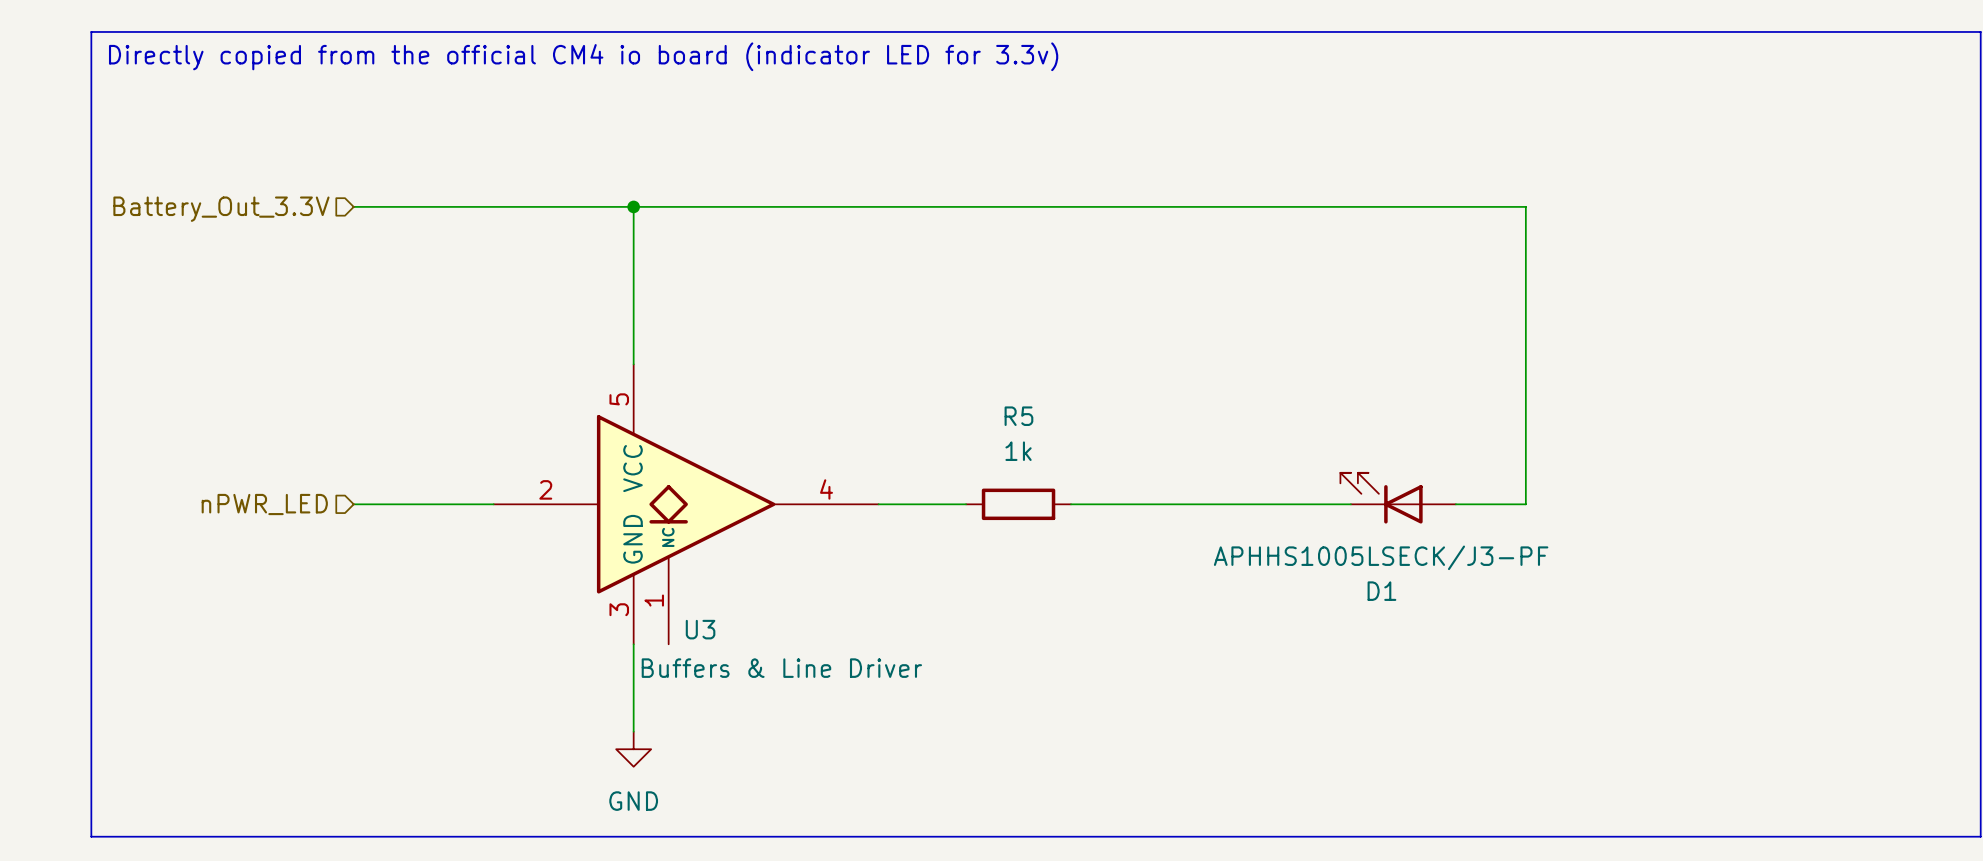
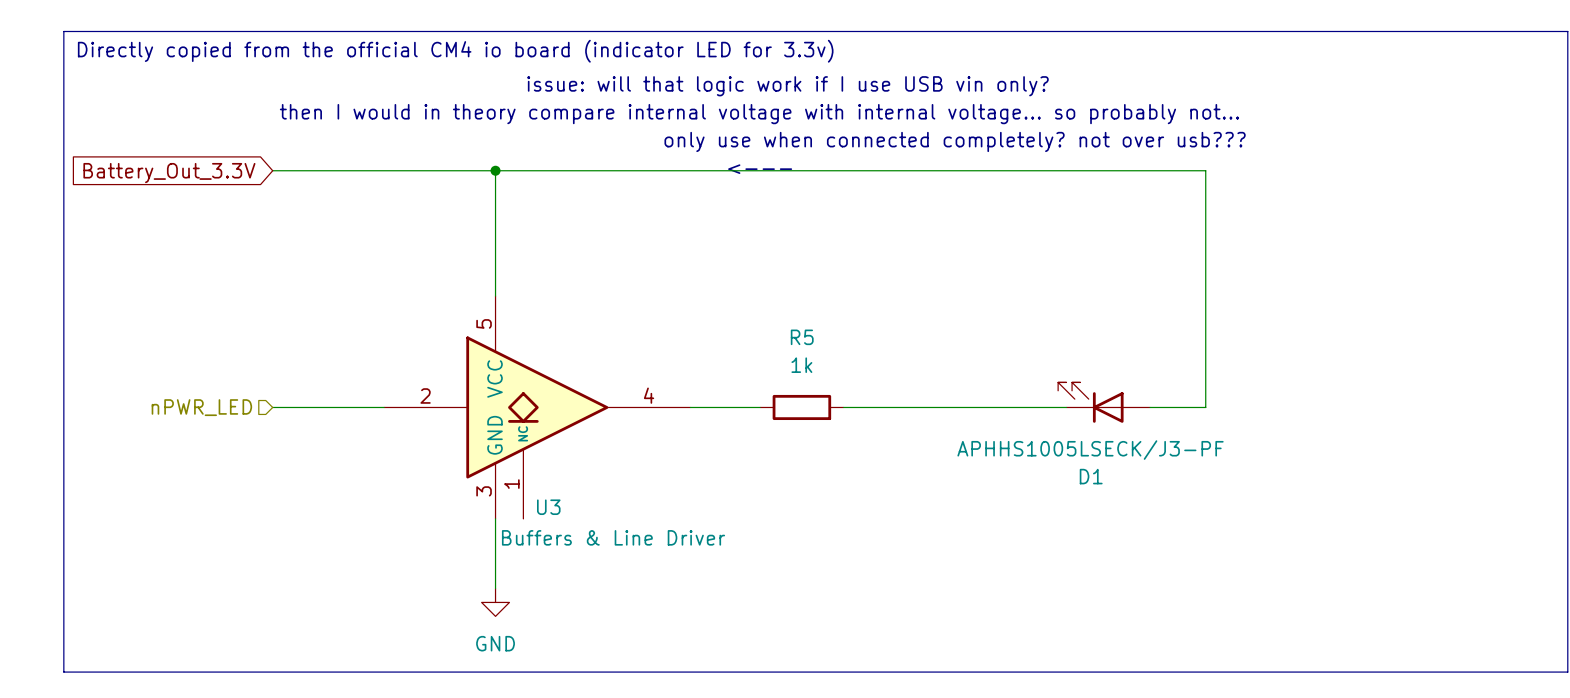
text: none -> issue: will that logic work if I use USB vin only? (787, 86)
text: none -> then I would in theory compare internal voltage with internal voltage... so probably not... (759, 114)
text: none -> only use when connected completely? not over usb??? (955, 141)
text: none -> <--- (760, 169)
hierarchical label: Battery_Out_3.3V (221, 209) -> none
global label: none -> Battery_Out_3.3V (169, 173)

